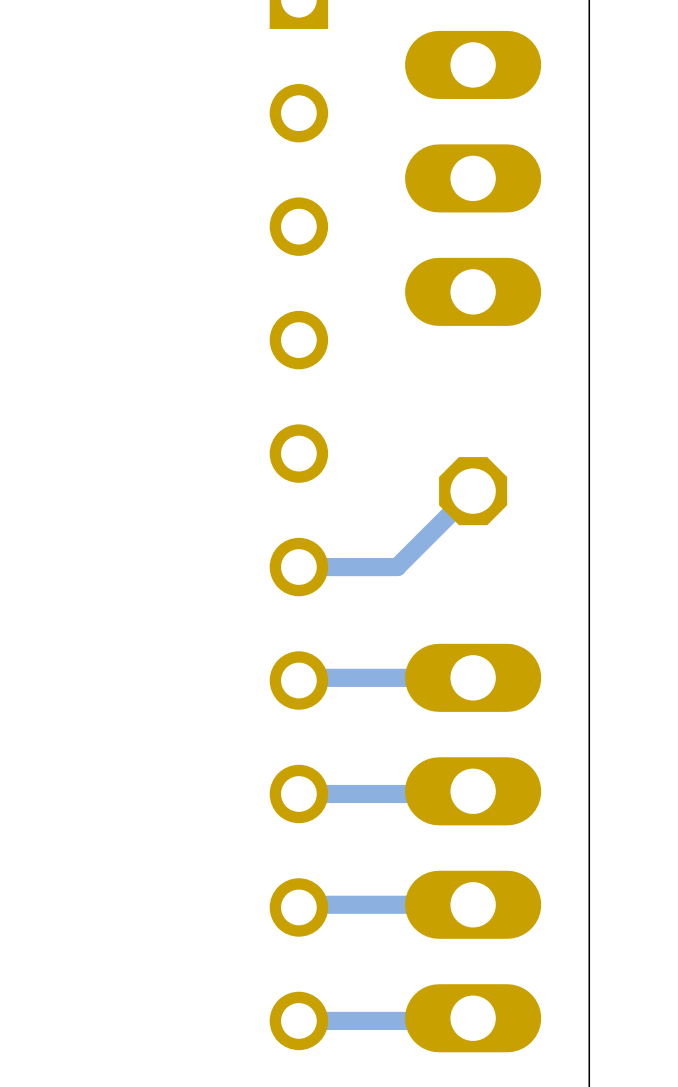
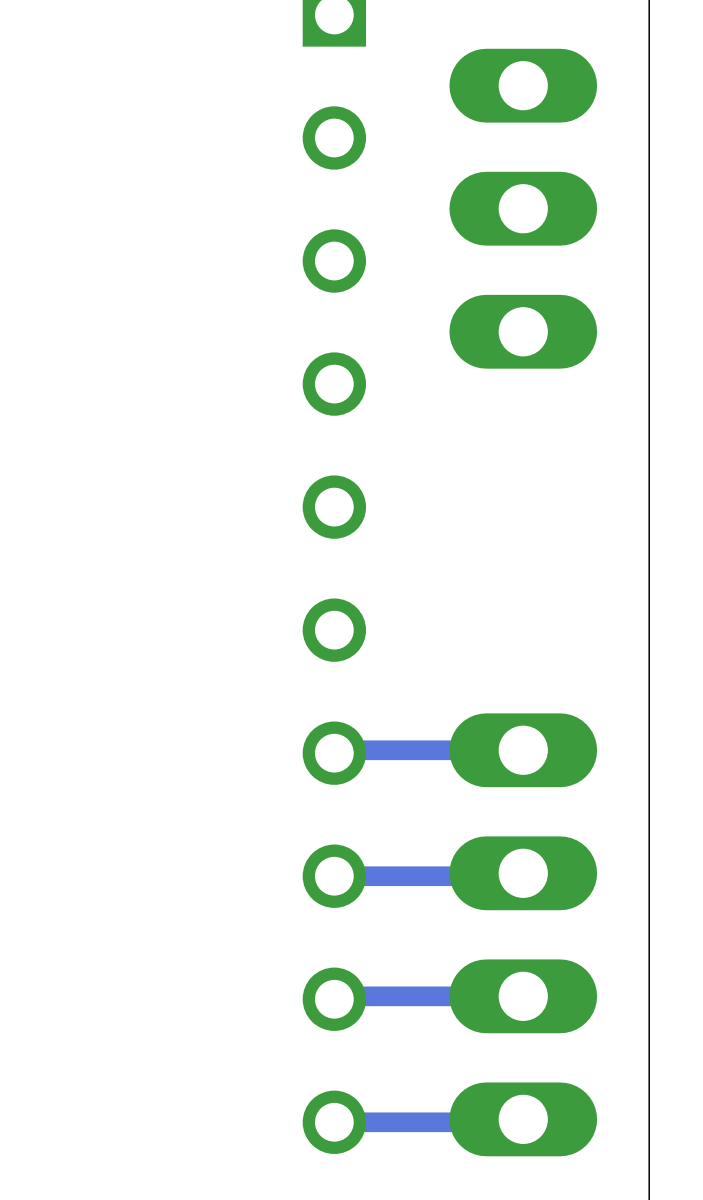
track: (473, 491) (397, 567) (298, 567) -> none
part: (473, 491) -> none

